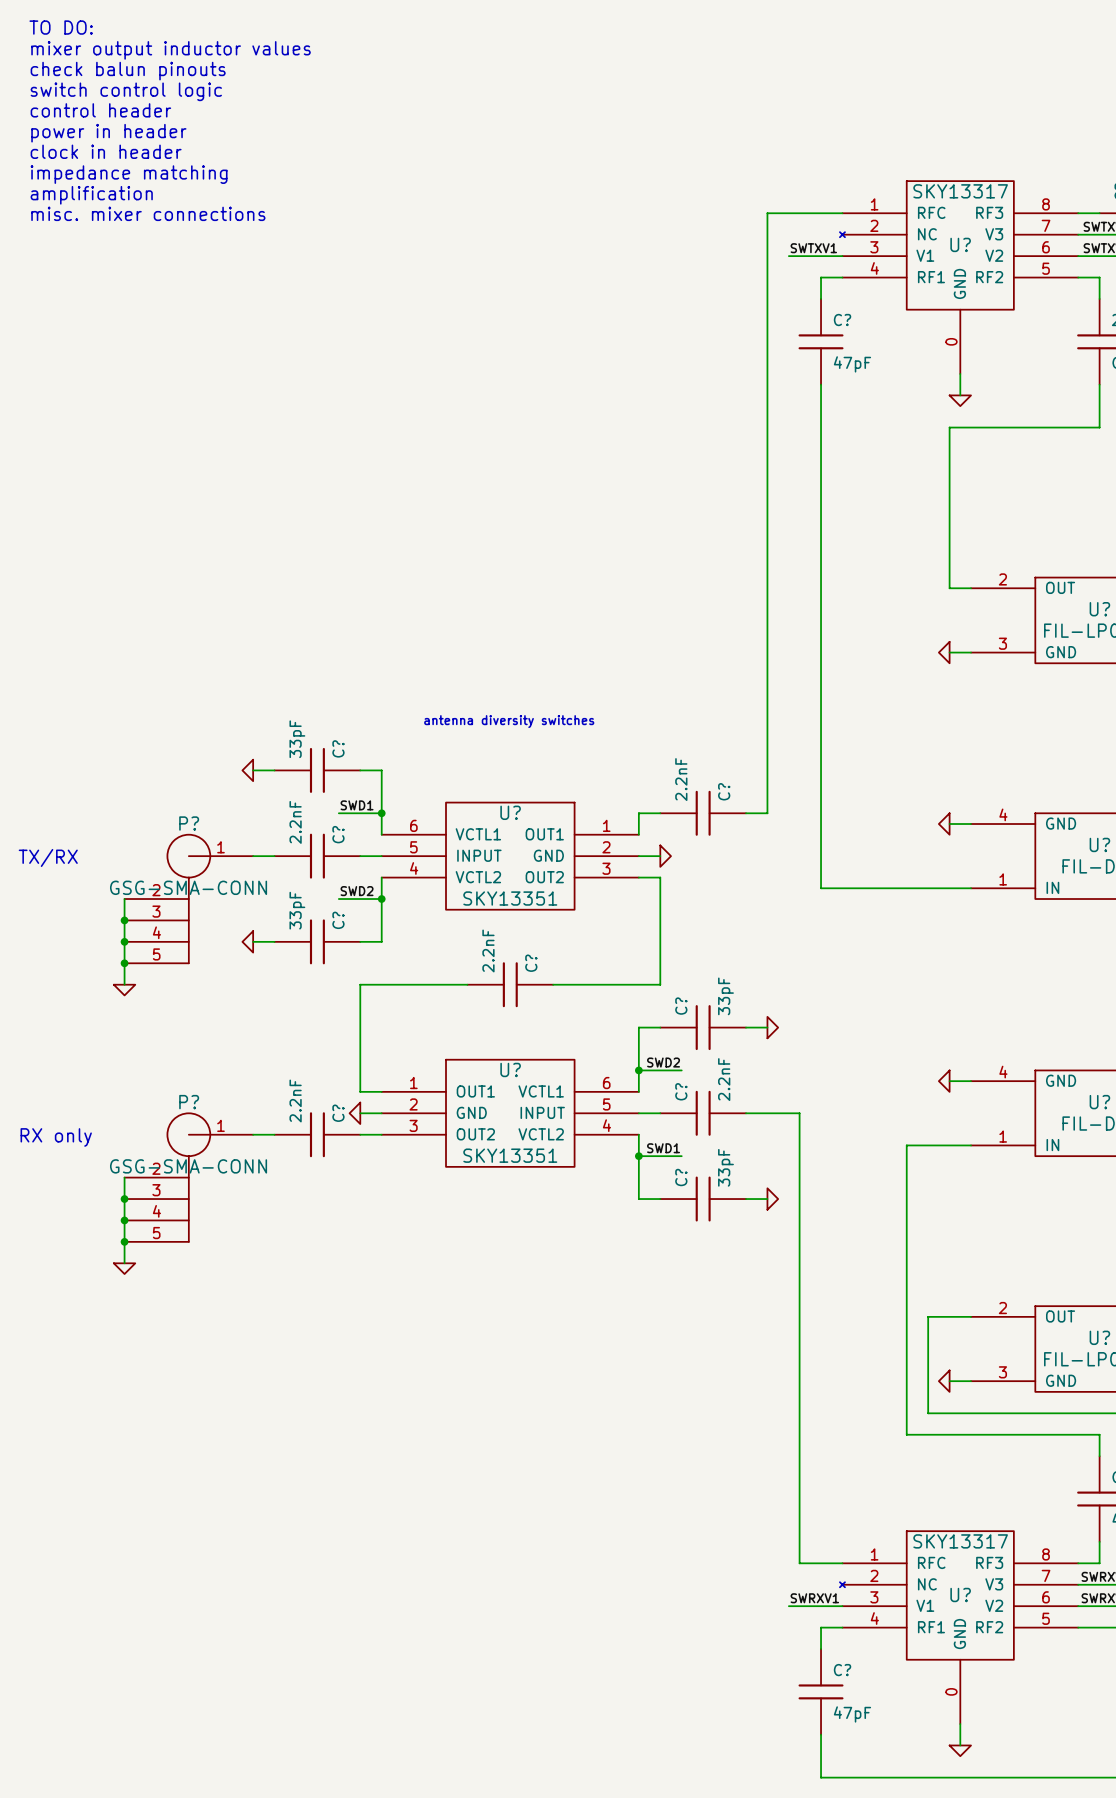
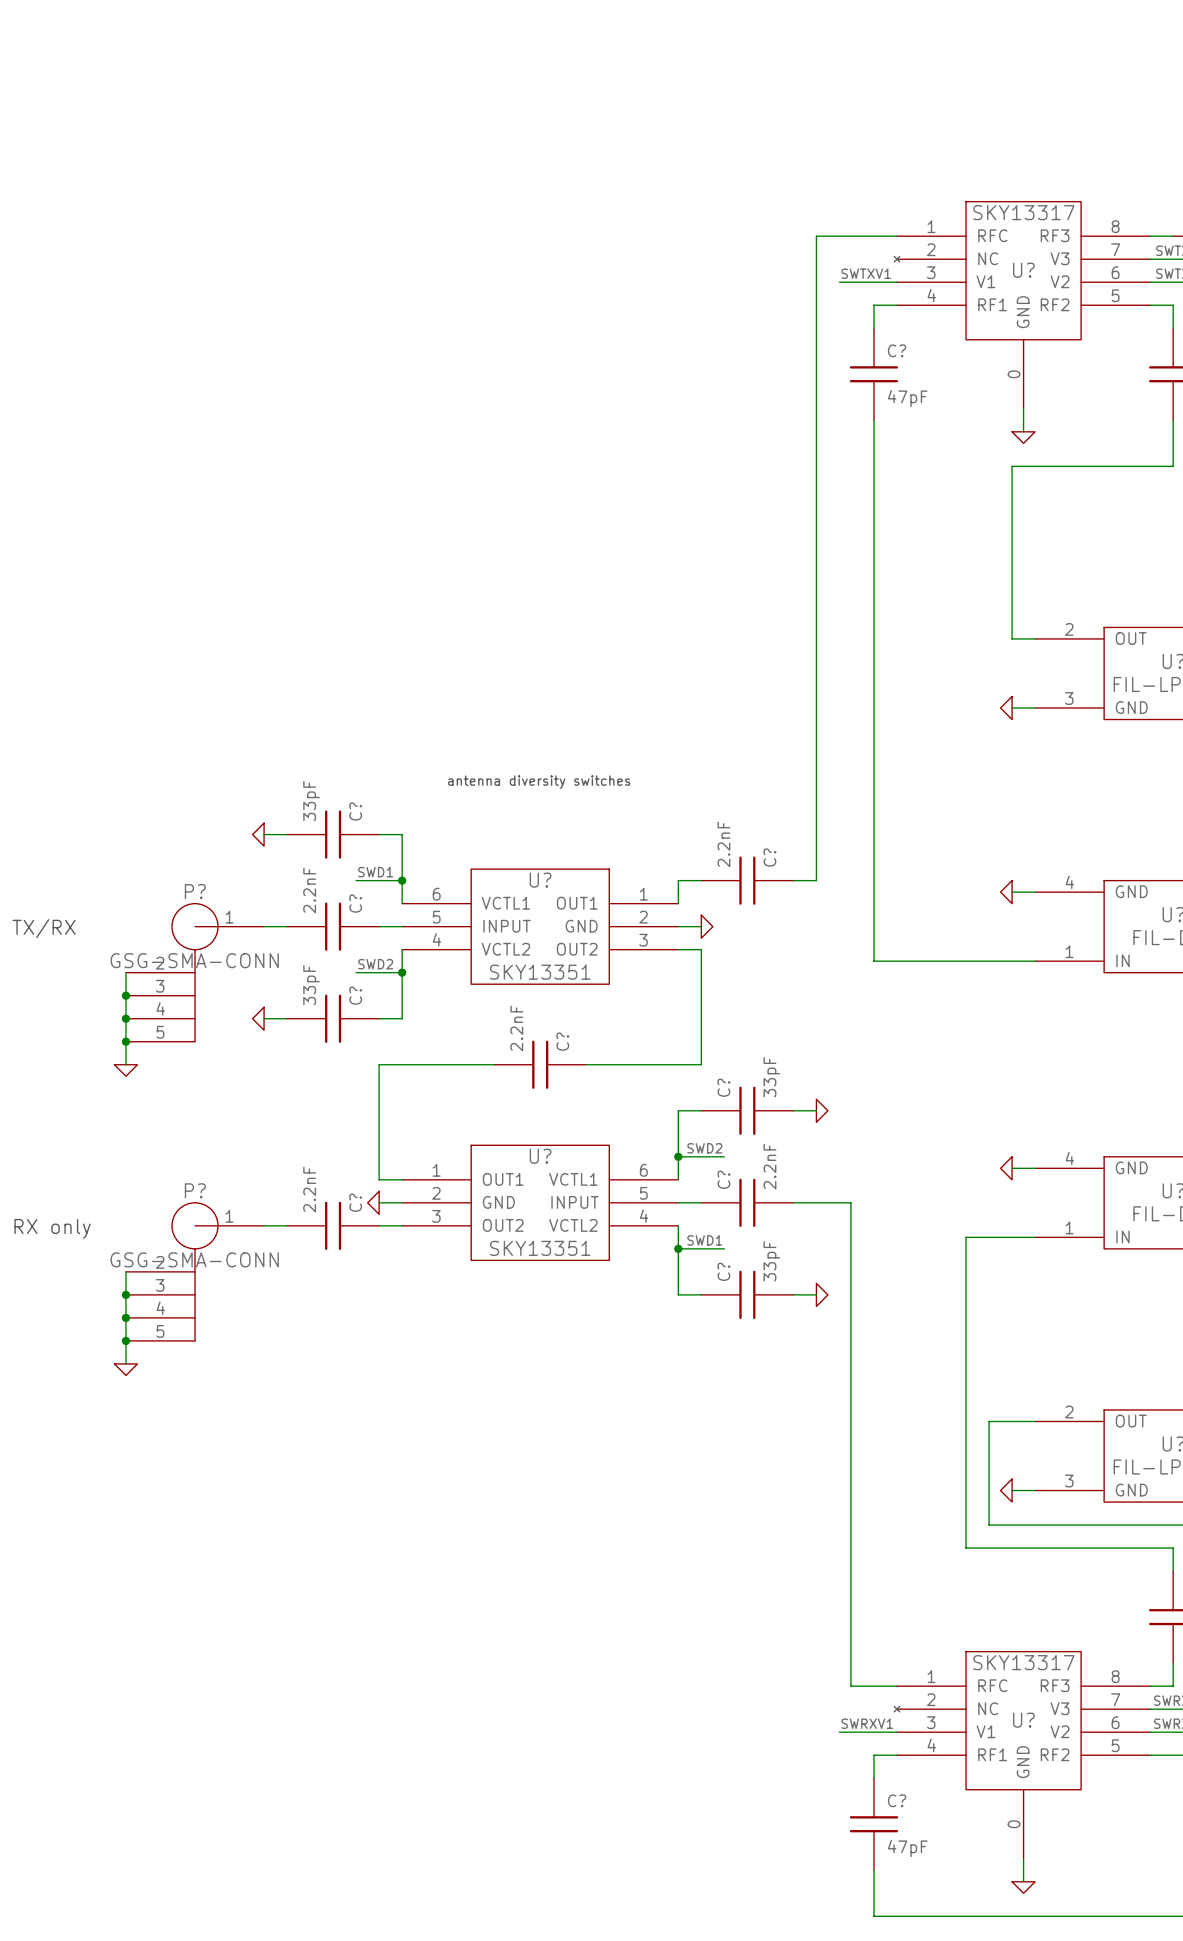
text: TO DO: (61, 27) -> none
text: mixer output inductor values (171, 50) -> none
text: check balun pinouts (128, 71) -> none
text: switch control logic (126, 91) -> none
text: control header (100, 110) -> none
text: power in header (108, 133) -> none
text: clock in header (106, 151) -> none
text: impedance matching (129, 174) -> none
text: amplification (91, 195) -> none
text: misc. mixer connections (148, 213) -> none

